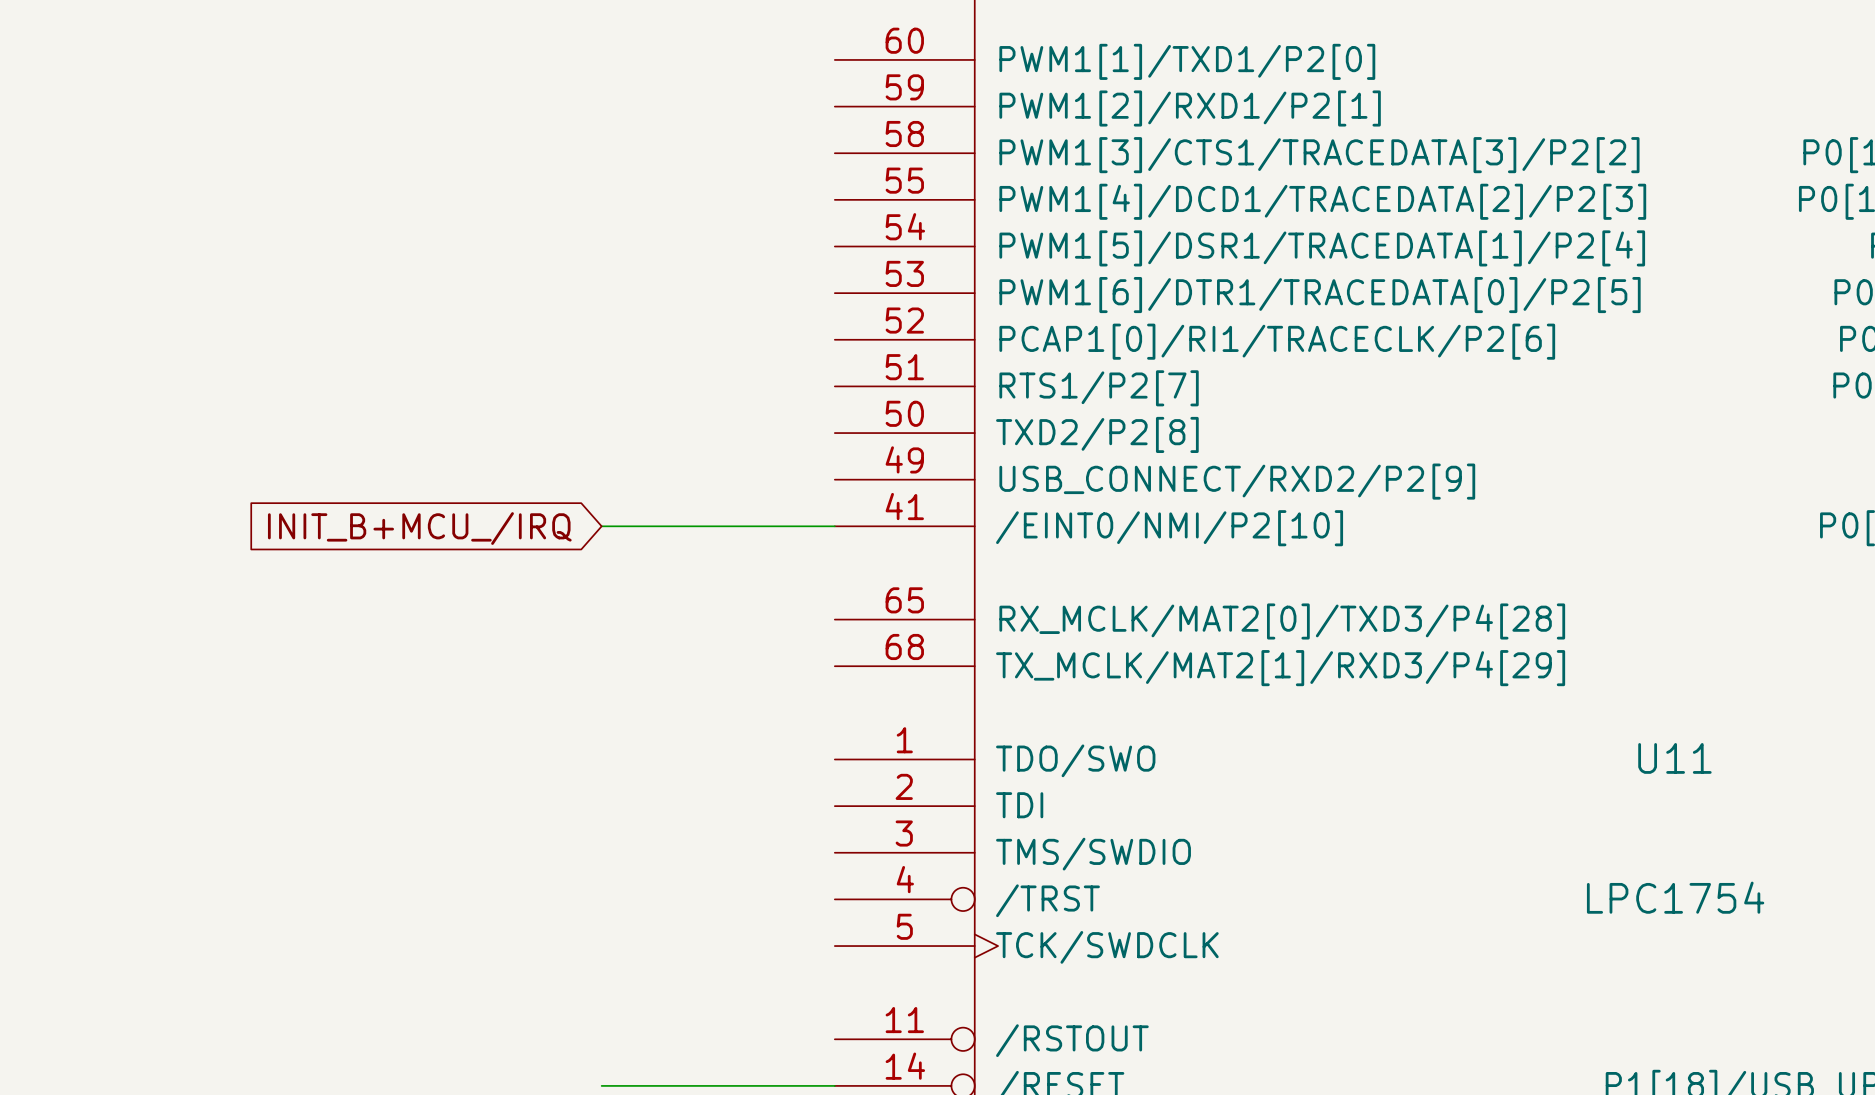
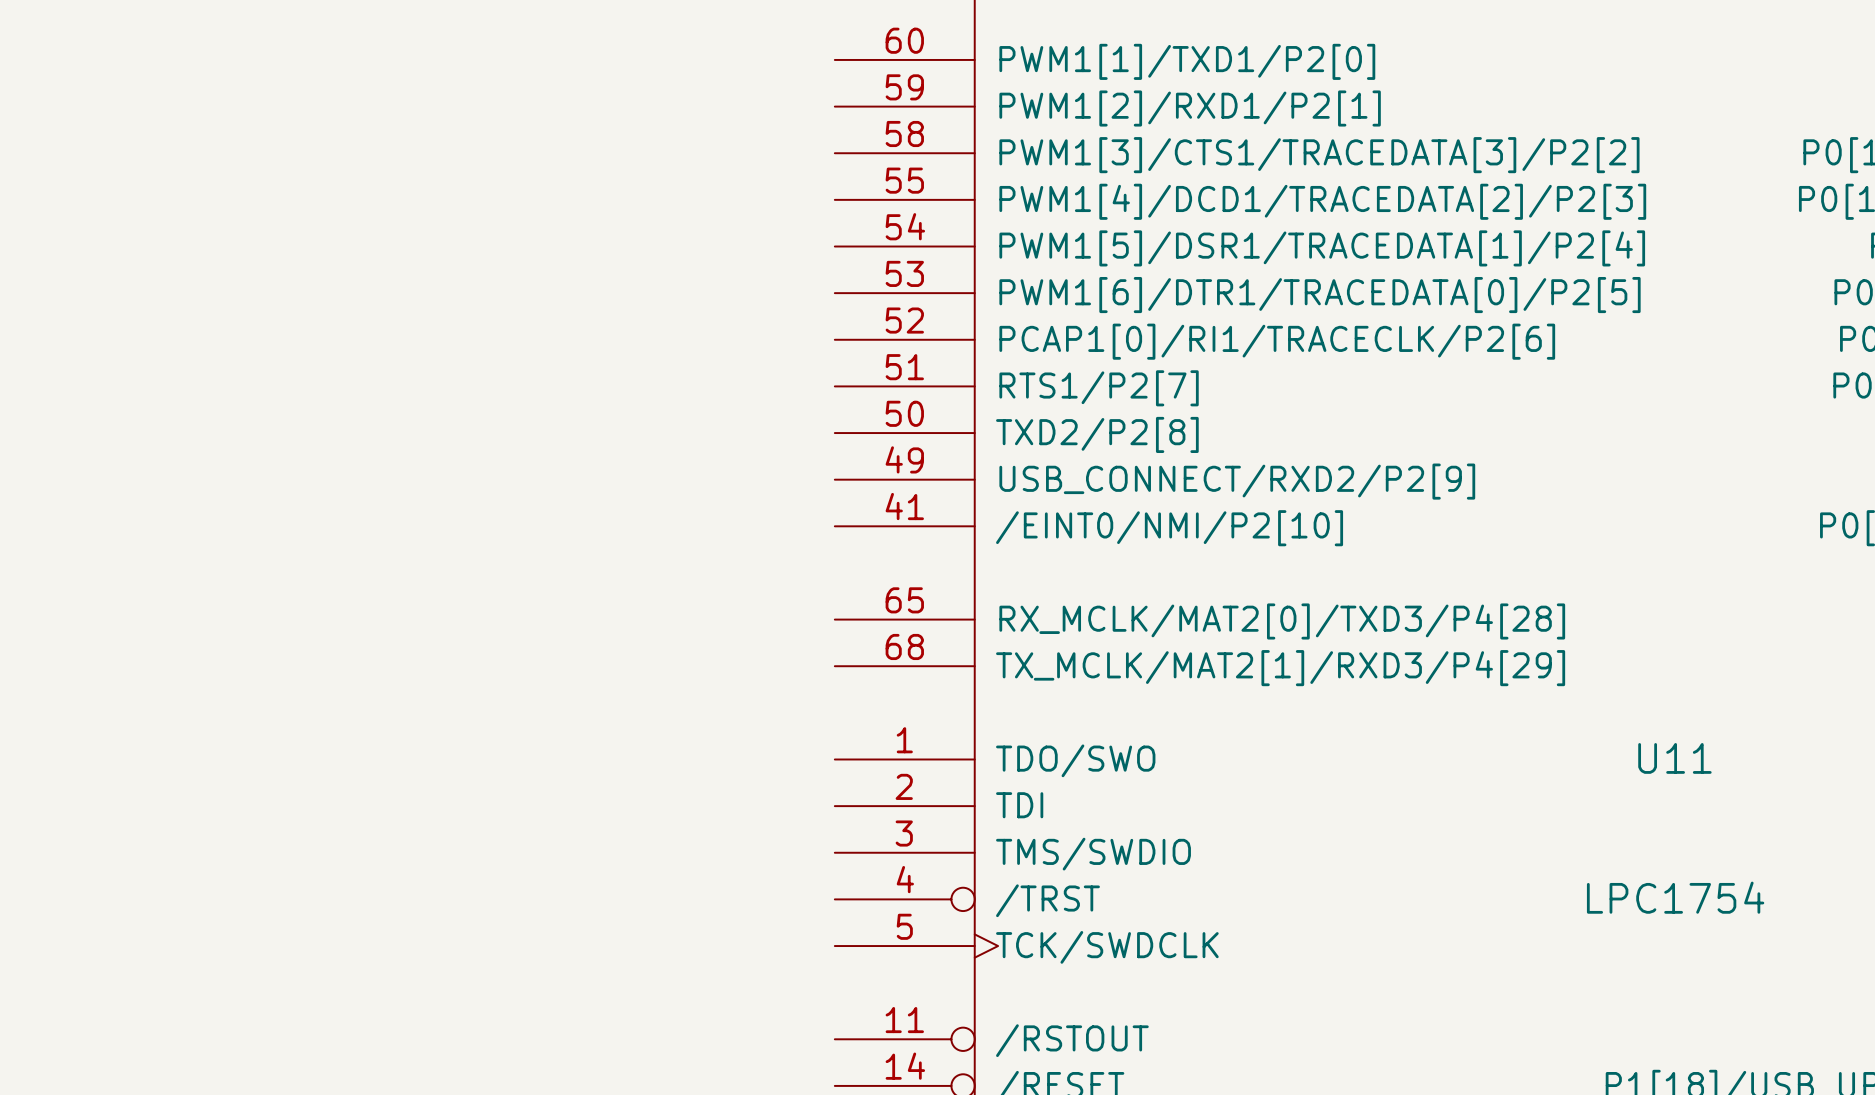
wire: (601, 526) (834, 526) -> none
global label: INIT_B+MCU_/IRQ (419, 528) -> none
wire: (601, 1085) (834, 1085) -> none

